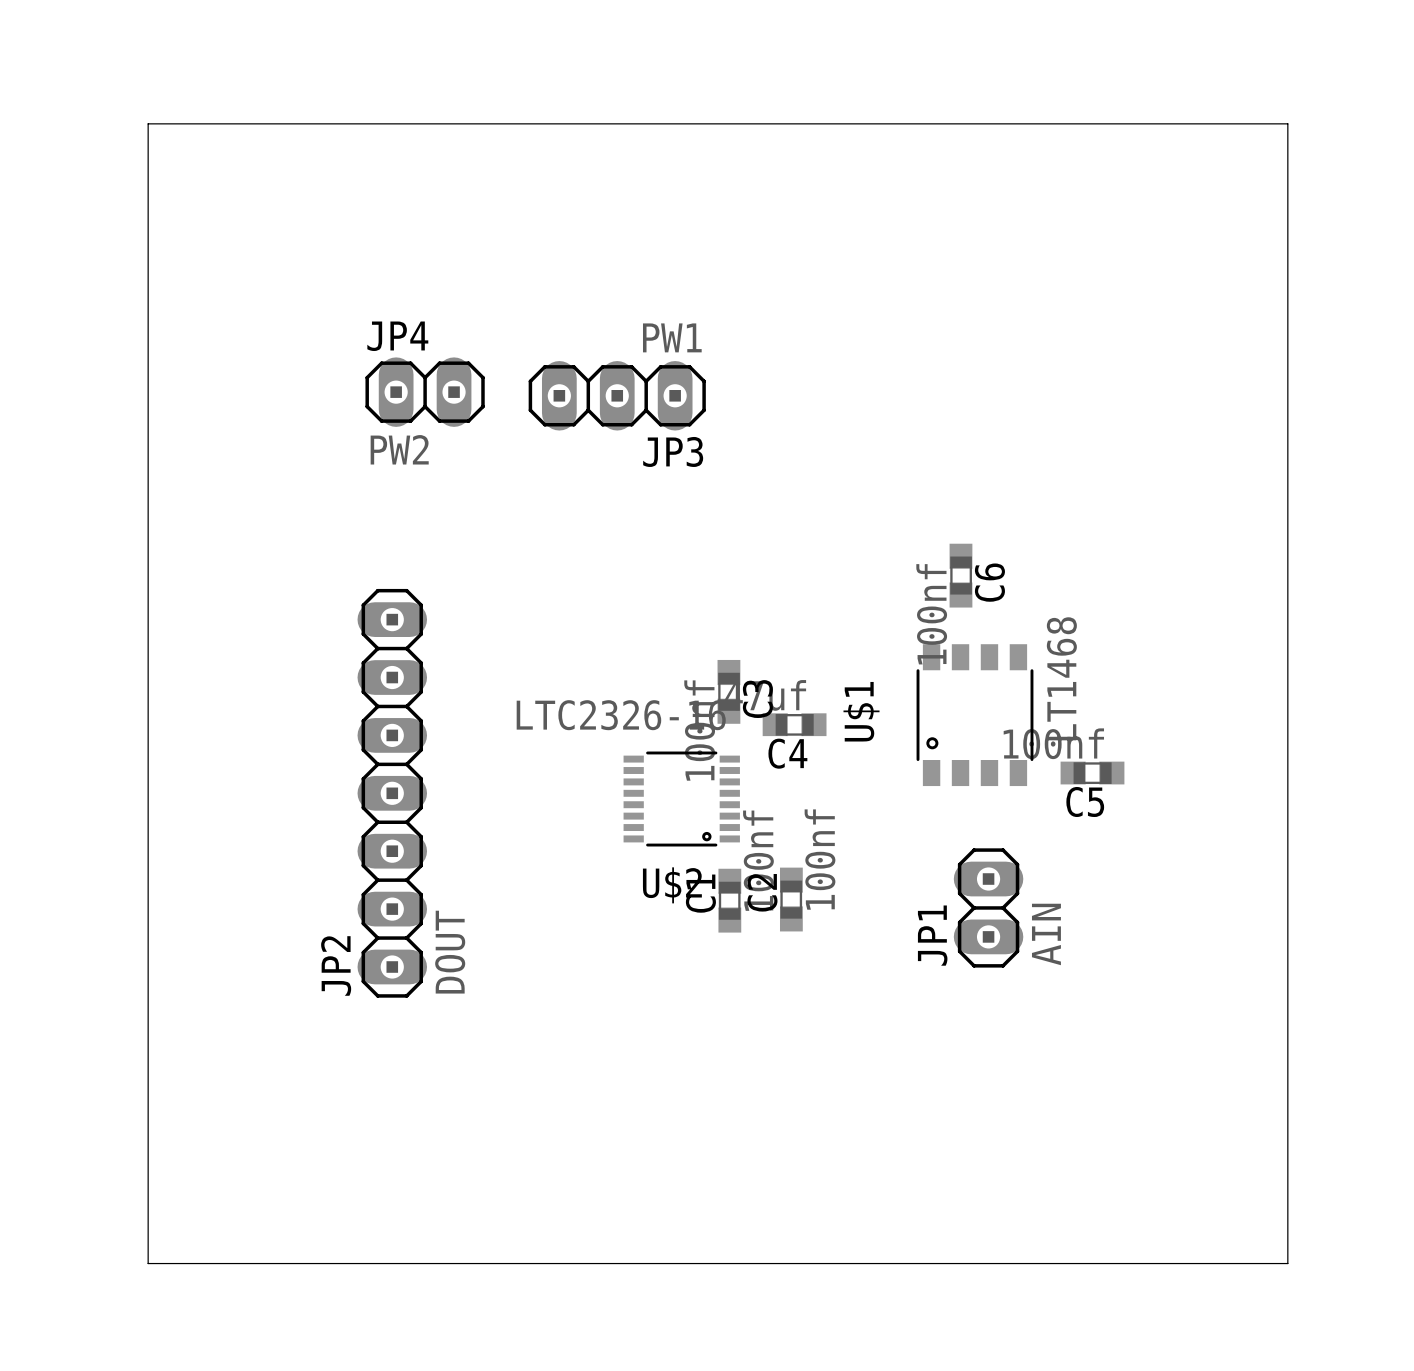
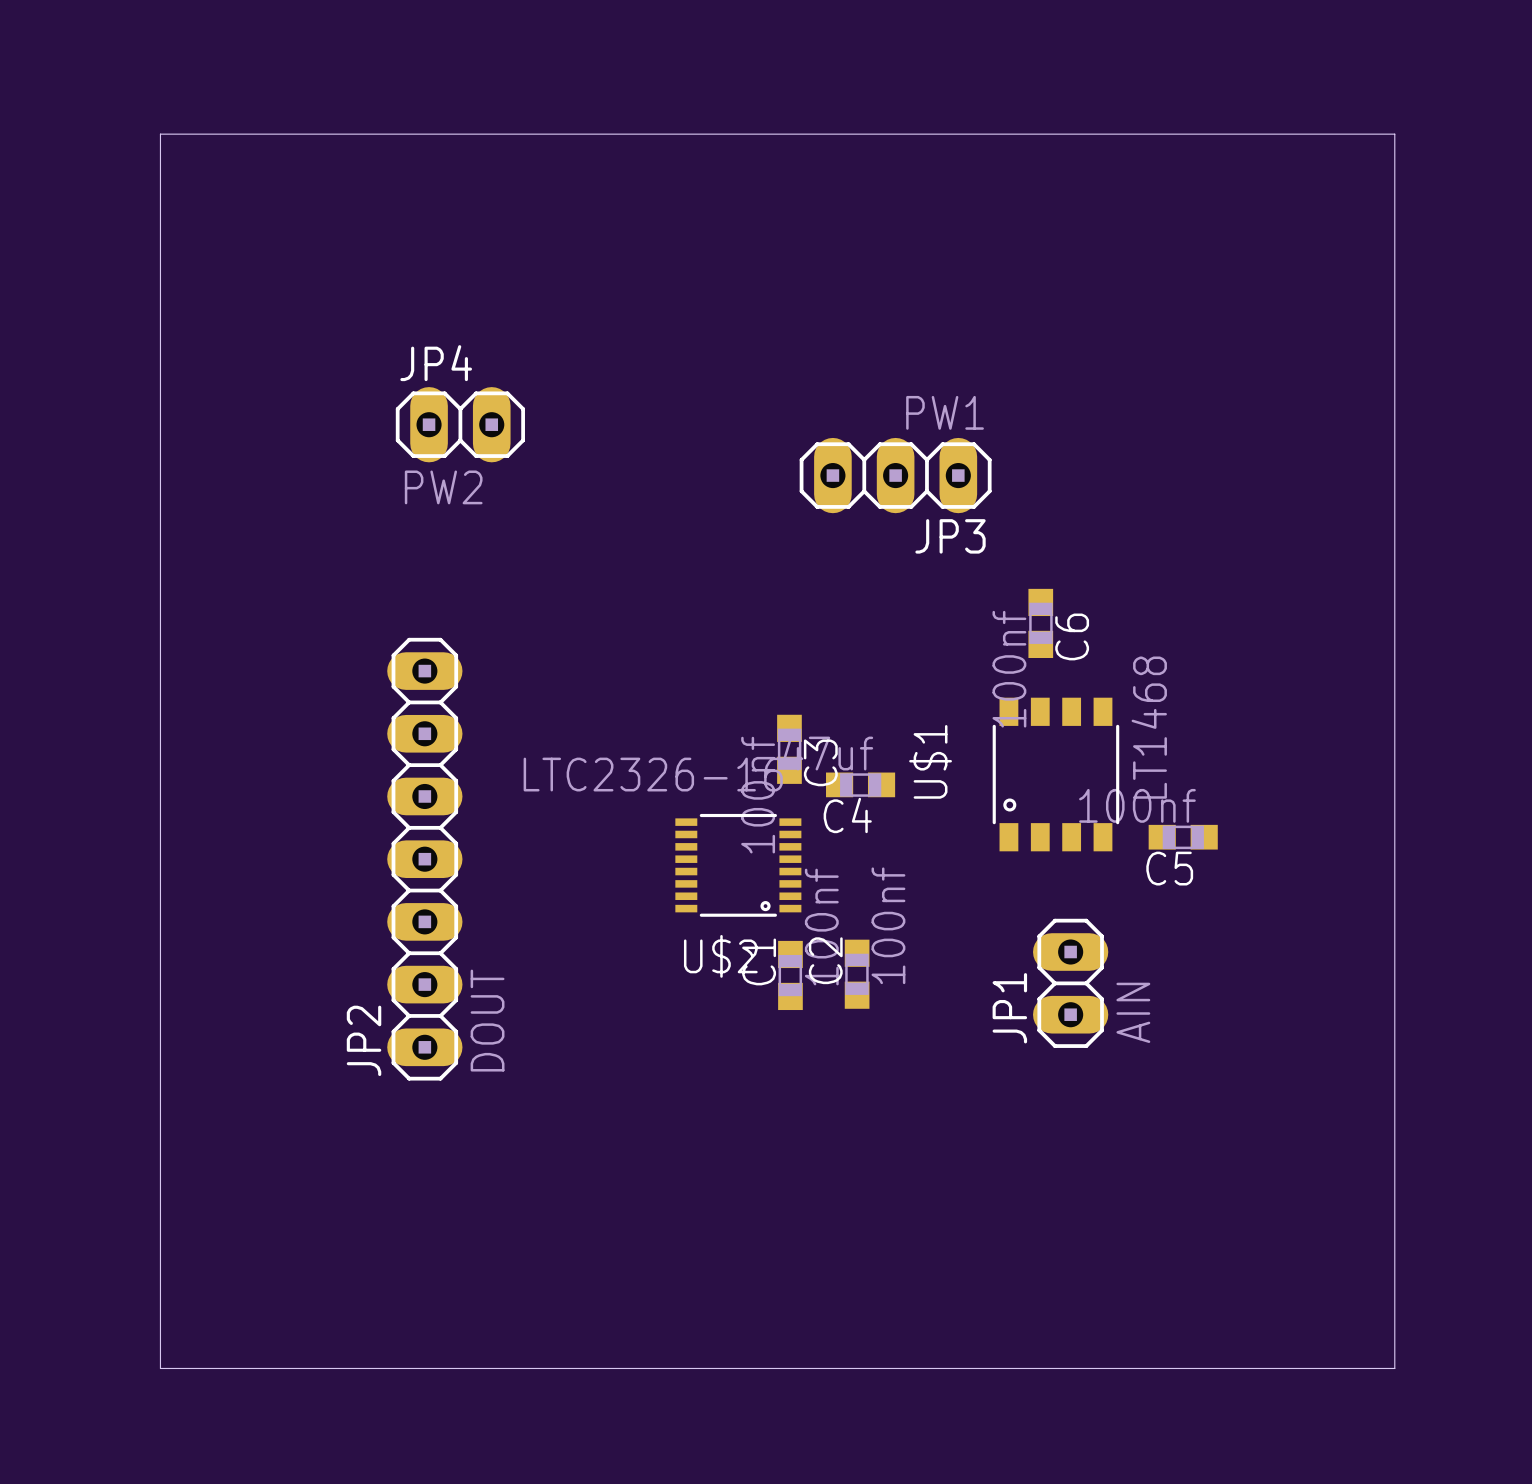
JP3 position: (617, 395) -> (895, 475)

